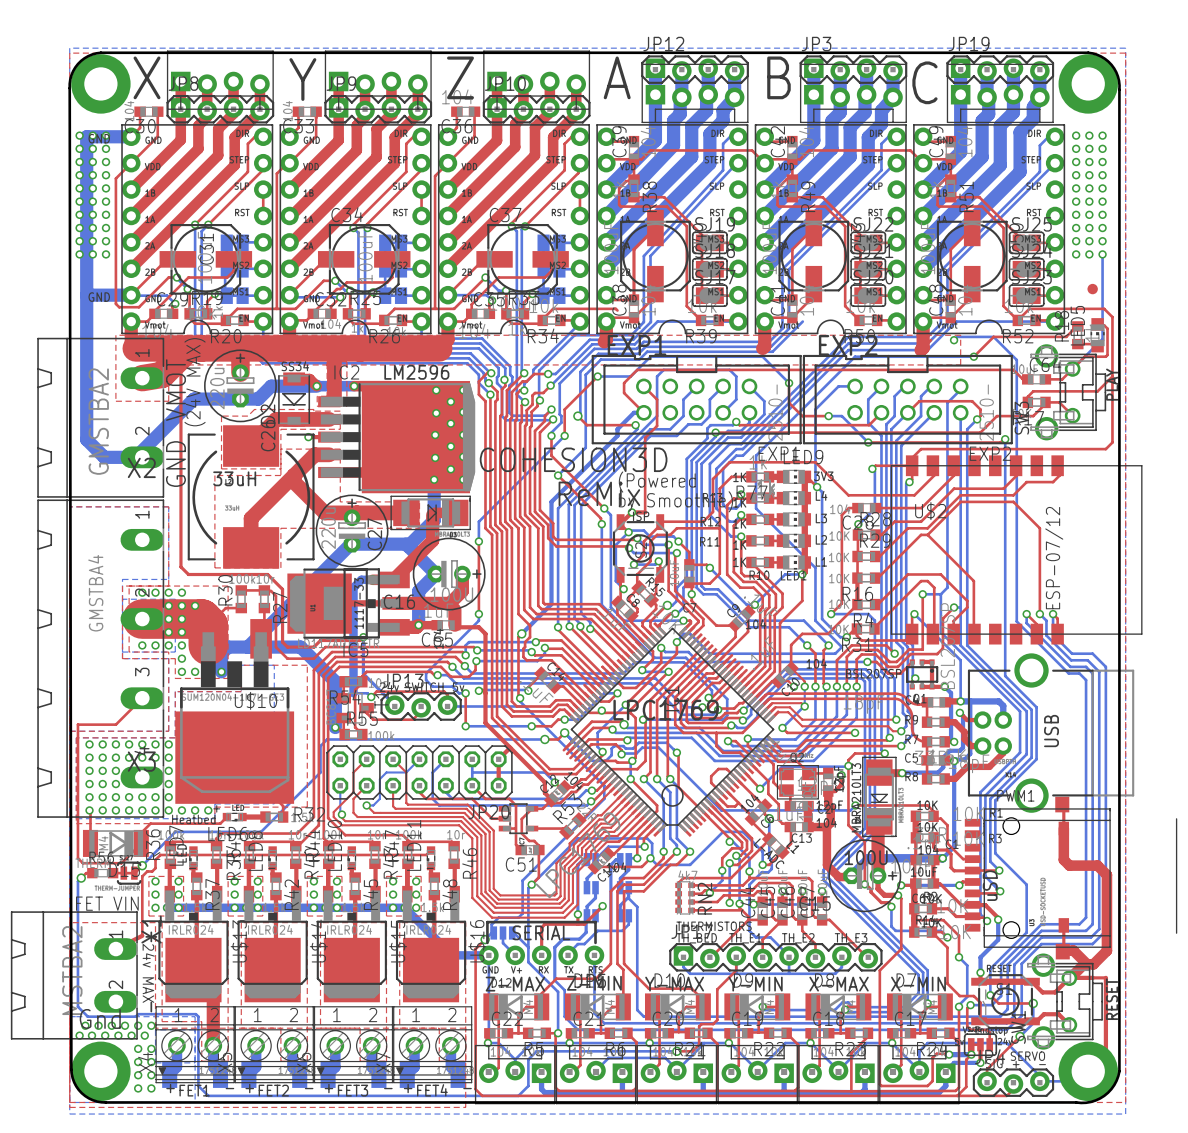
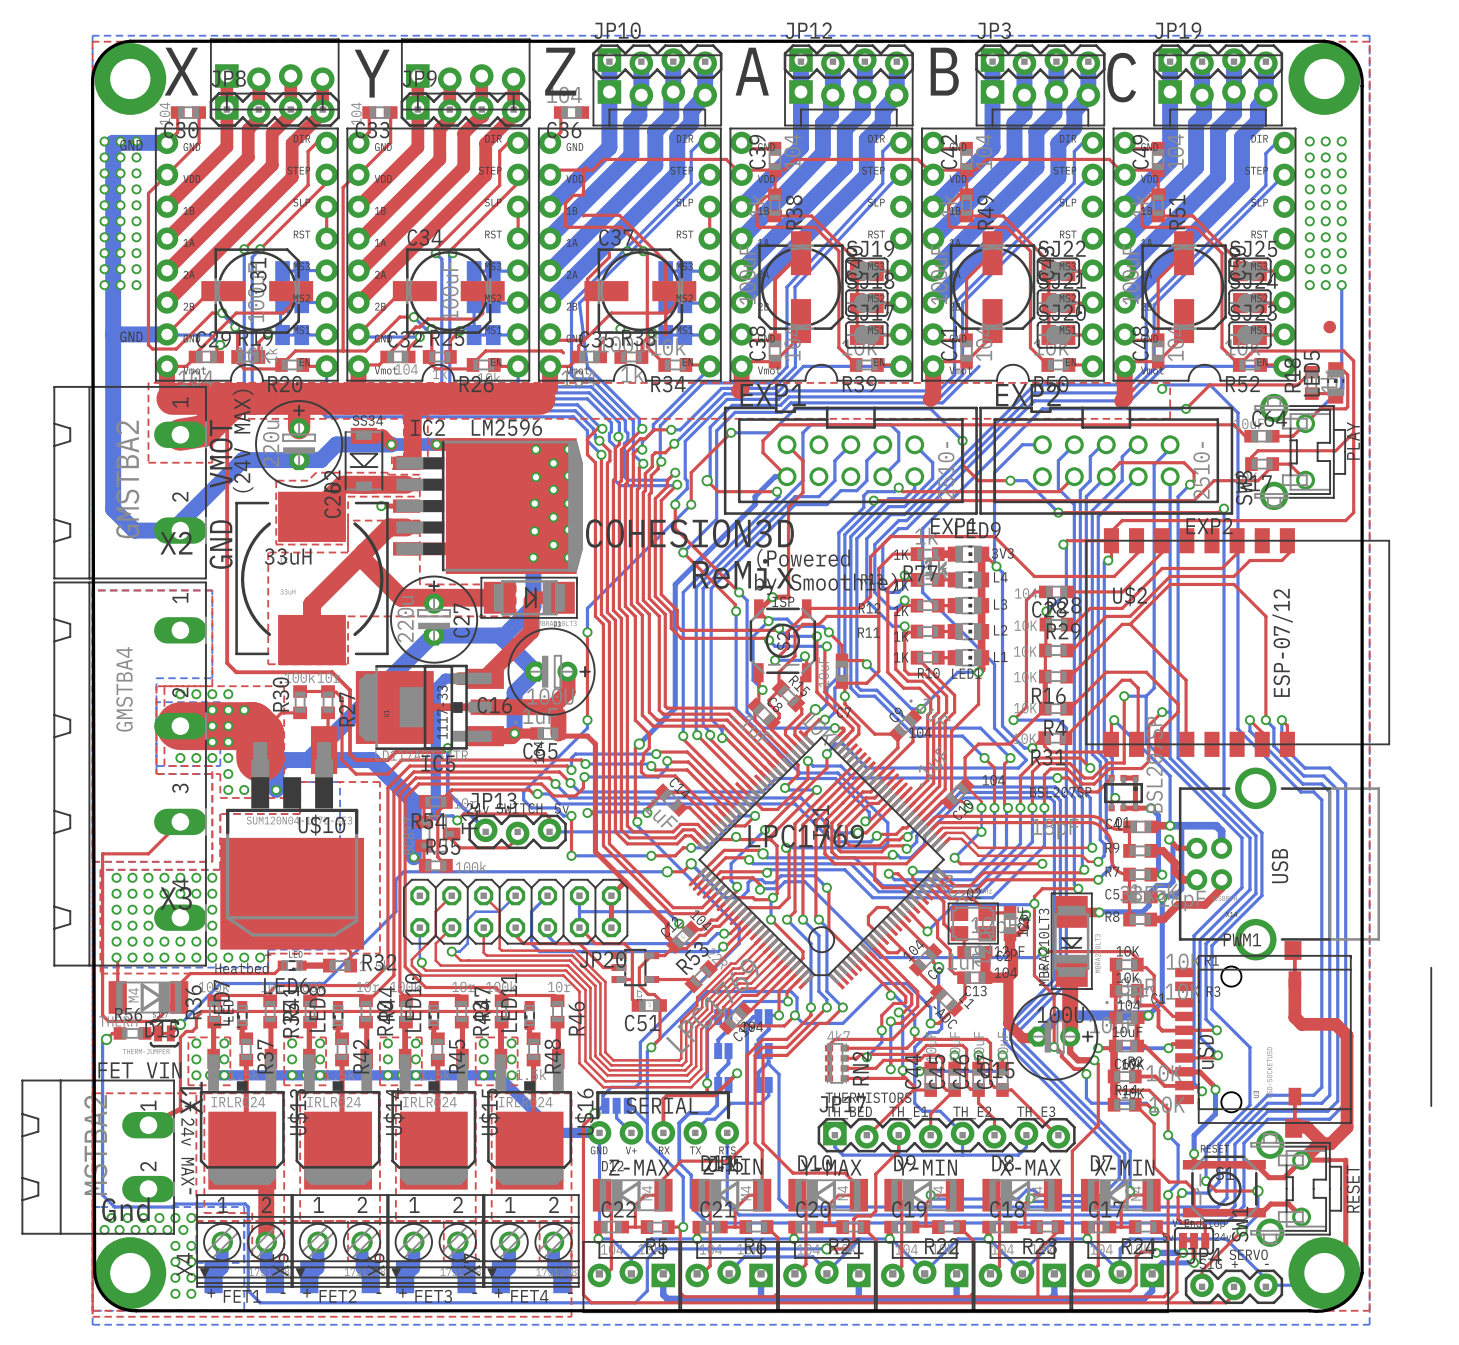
bottom track: none -> (609, 60) (609, 147) (550, 206)
bottom track: none -> (673, 60) (671, 115) (655, 131) (655, 165) (550, 270)
bottom track: none -> (641, 63) (639, 115) (631, 123) (631, 155) (550, 238)
bottom track: none -> (705, 63) (705, 95) (691, 111) (691, 123) (677, 137) (677, 173) (550, 302)
part position: (536, 80) -> (657, 90)
top track: (497, 81) (497, 140) (448, 189) -> none
top track: (549, 81) (548, 114) (534, 127) (534, 155) (448, 242) -> none
top track: (523, 84) (523, 115) (515, 124) (515, 147) (447, 215) -> none
top track: (576, 84) (576, 114) (553, 137) (553, 162) (447, 268) -> none
JP10 position: (536, 109) -> (657, 61)
top track: (474, 111) (474, 136) (451, 159) -> (741, 174) (726, 159) (603, 159) (592, 170) (554, 170)
top track: (579, 136) (571, 136) (564, 143) (564, 170) (511, 223) (511, 226) -> none
top track: (447, 163) (435, 176) (435, 308) -> none
top track: (578, 163) (578, 173) (525, 226) -> none
top track: none -> (583, 216) (619, 215) (665, 261) (665, 335)
bottom track: (511, 226) (516, 231) (516, 366) -> (709, 142) (699, 142) (691, 151) (691, 183) (571, 303) (571, 374) (575, 378) (591, 378) (633, 420)
bottom track: (525, 226) (521, 229) (521, 364) -> (709, 174) (579, 303) (587, 366) (639, 418)
top track: (494, 259) (483, 259) (447, 295) -> (609, 253) (609, 257) (587, 279) (587, 336) (583, 340) (555, 340) (550, 334)
top track: (485, 277) (454, 308) -> (563, 352) (557, 350)
bottom track: (485, 277) (498, 290) (506, 290) -> none
via: (485, 277) -> none
top track: (506, 290) (506, 318) (511, 323) (539, 323) (542, 320) -> none
bottom track: (447, 295) (486, 295) (492, 300) -> none
via: (492, 300) -> none
top track: (617, 310) (615, 308) (553, 308) (542, 319) -> (586, 167) (583, 170) (583, 194) (573, 195) (565, 203) (565, 225) (567, 227) (621, 227) (647, 253) (647, 347) (664, 364)

